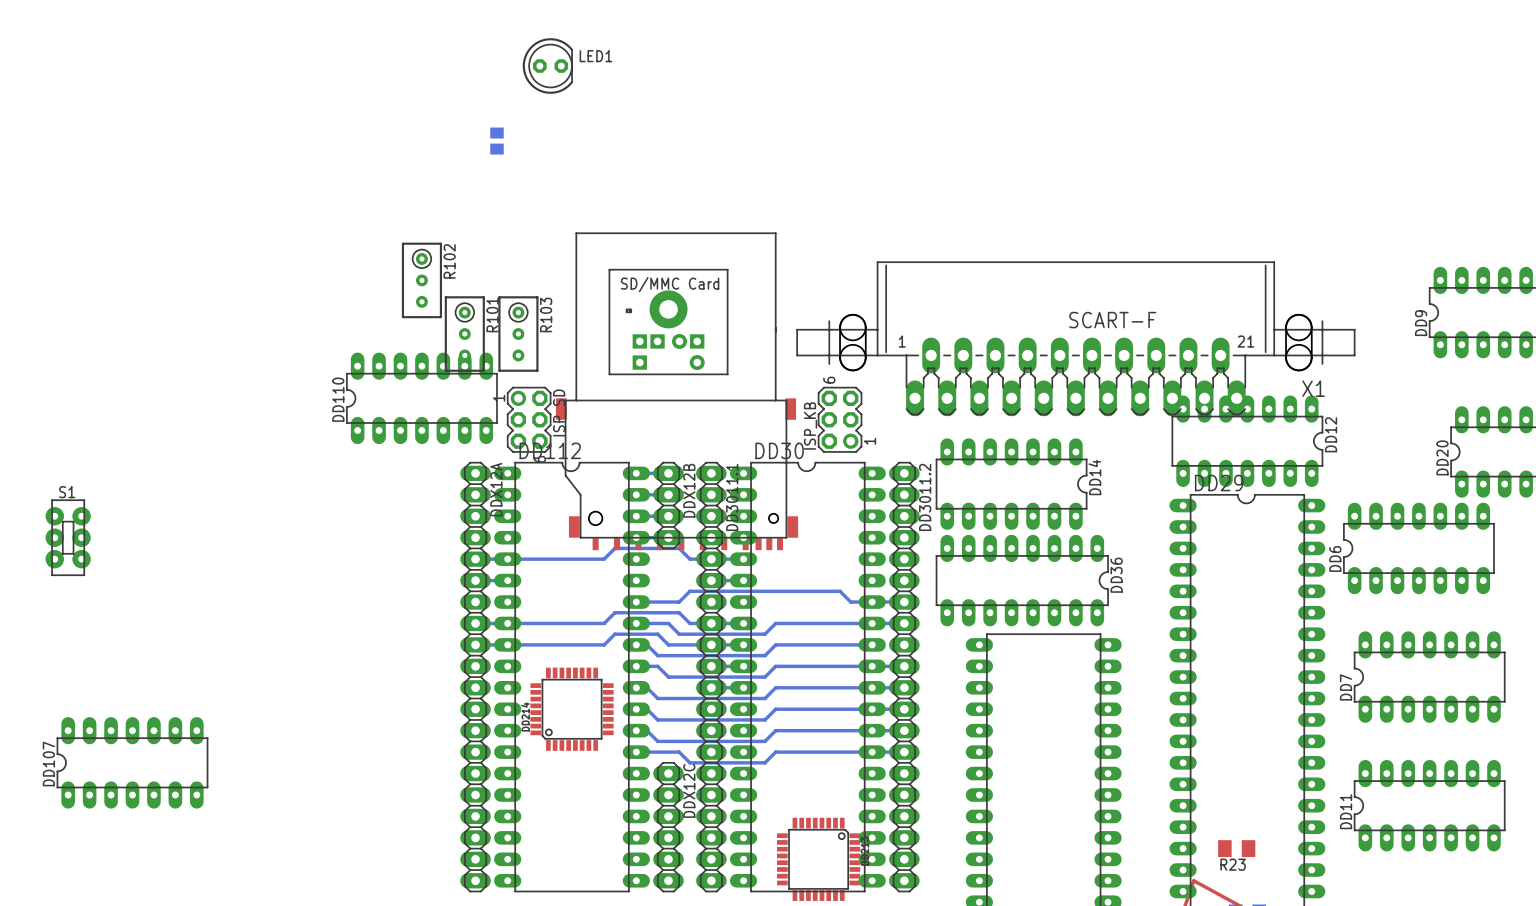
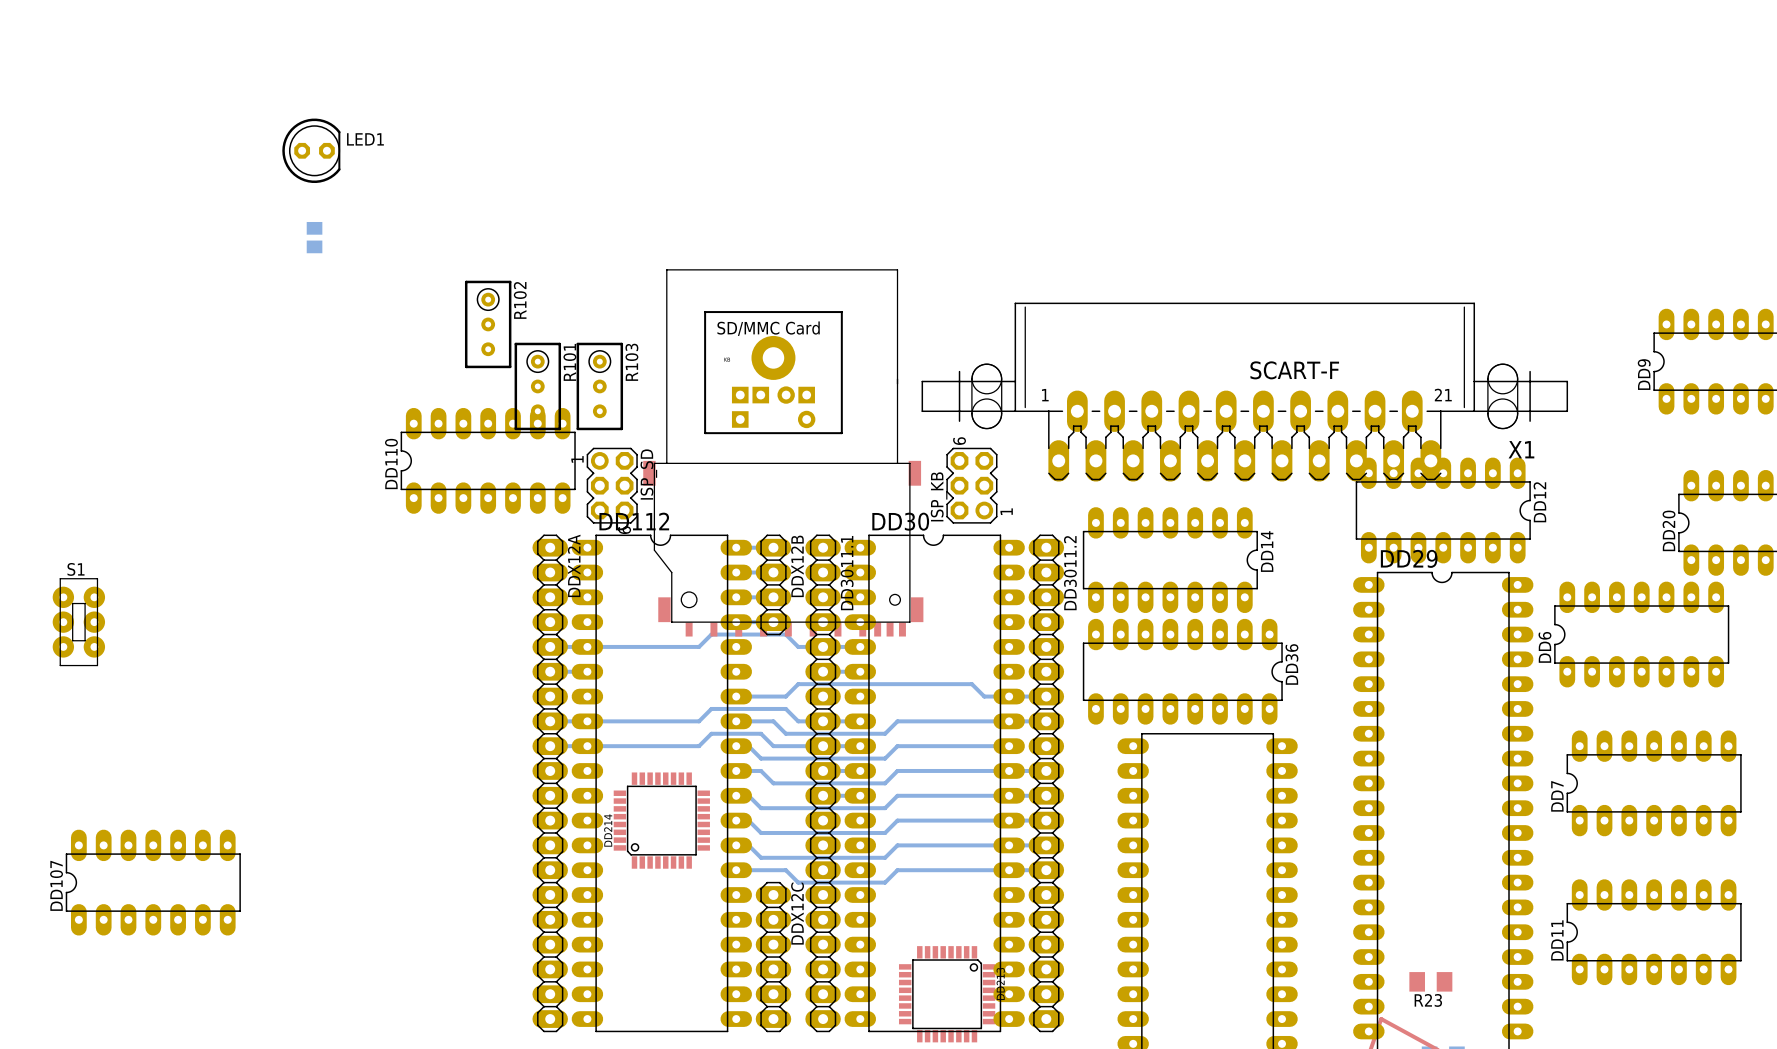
LED1 position: (547, 66) -> (311, 150)
part: (496, 141) -> none
part: none -> (314, 237)

